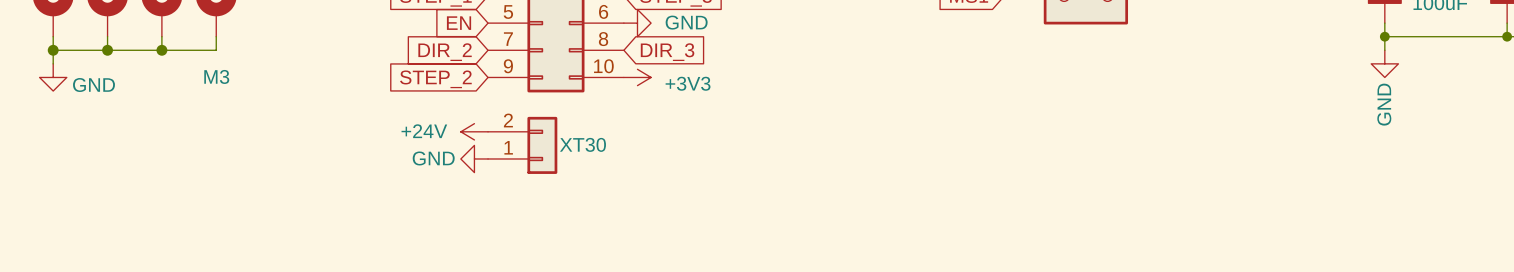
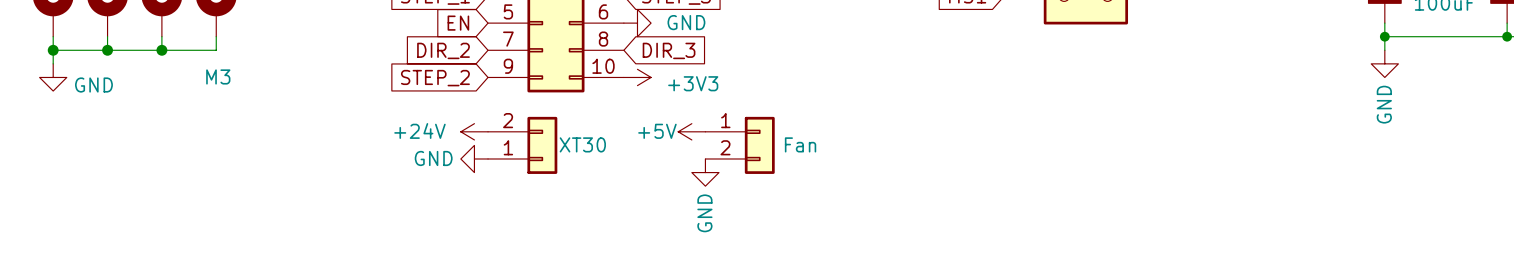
power symbol: none -> +5V (691, 131)
part: none -> Fan (740, 145)
power symbol: none -> GND (705, 172)

